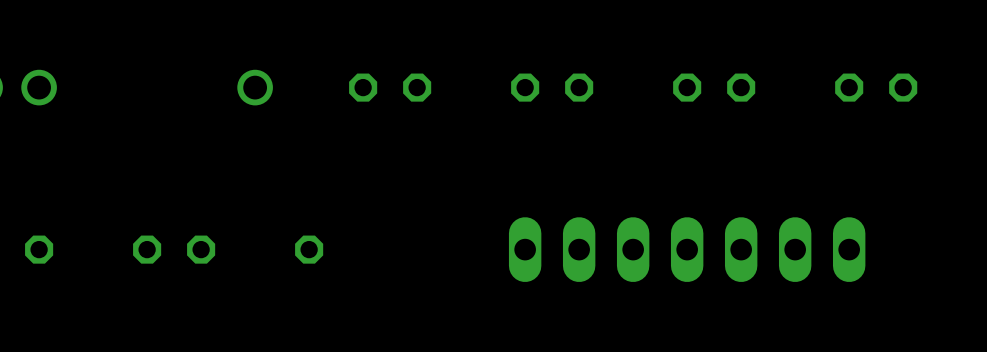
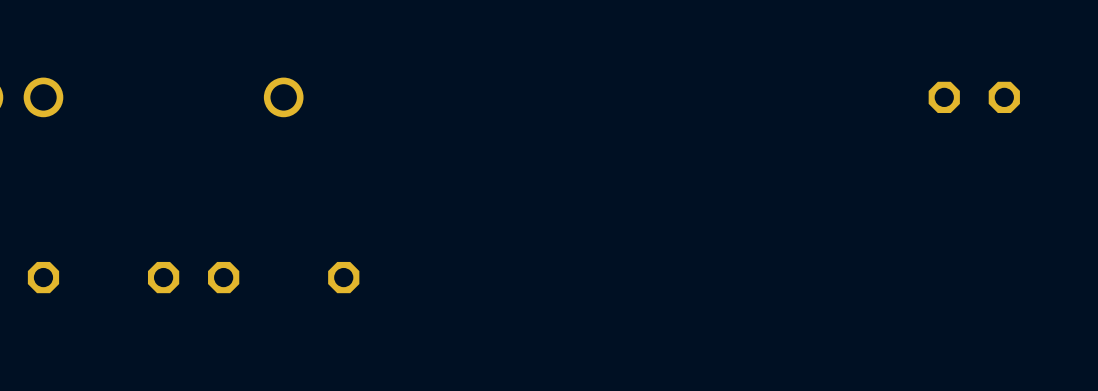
part: (390, 87) -> none
part: (552, 87) -> none
part: (714, 87) -> none
part: (687, 249) -> none

